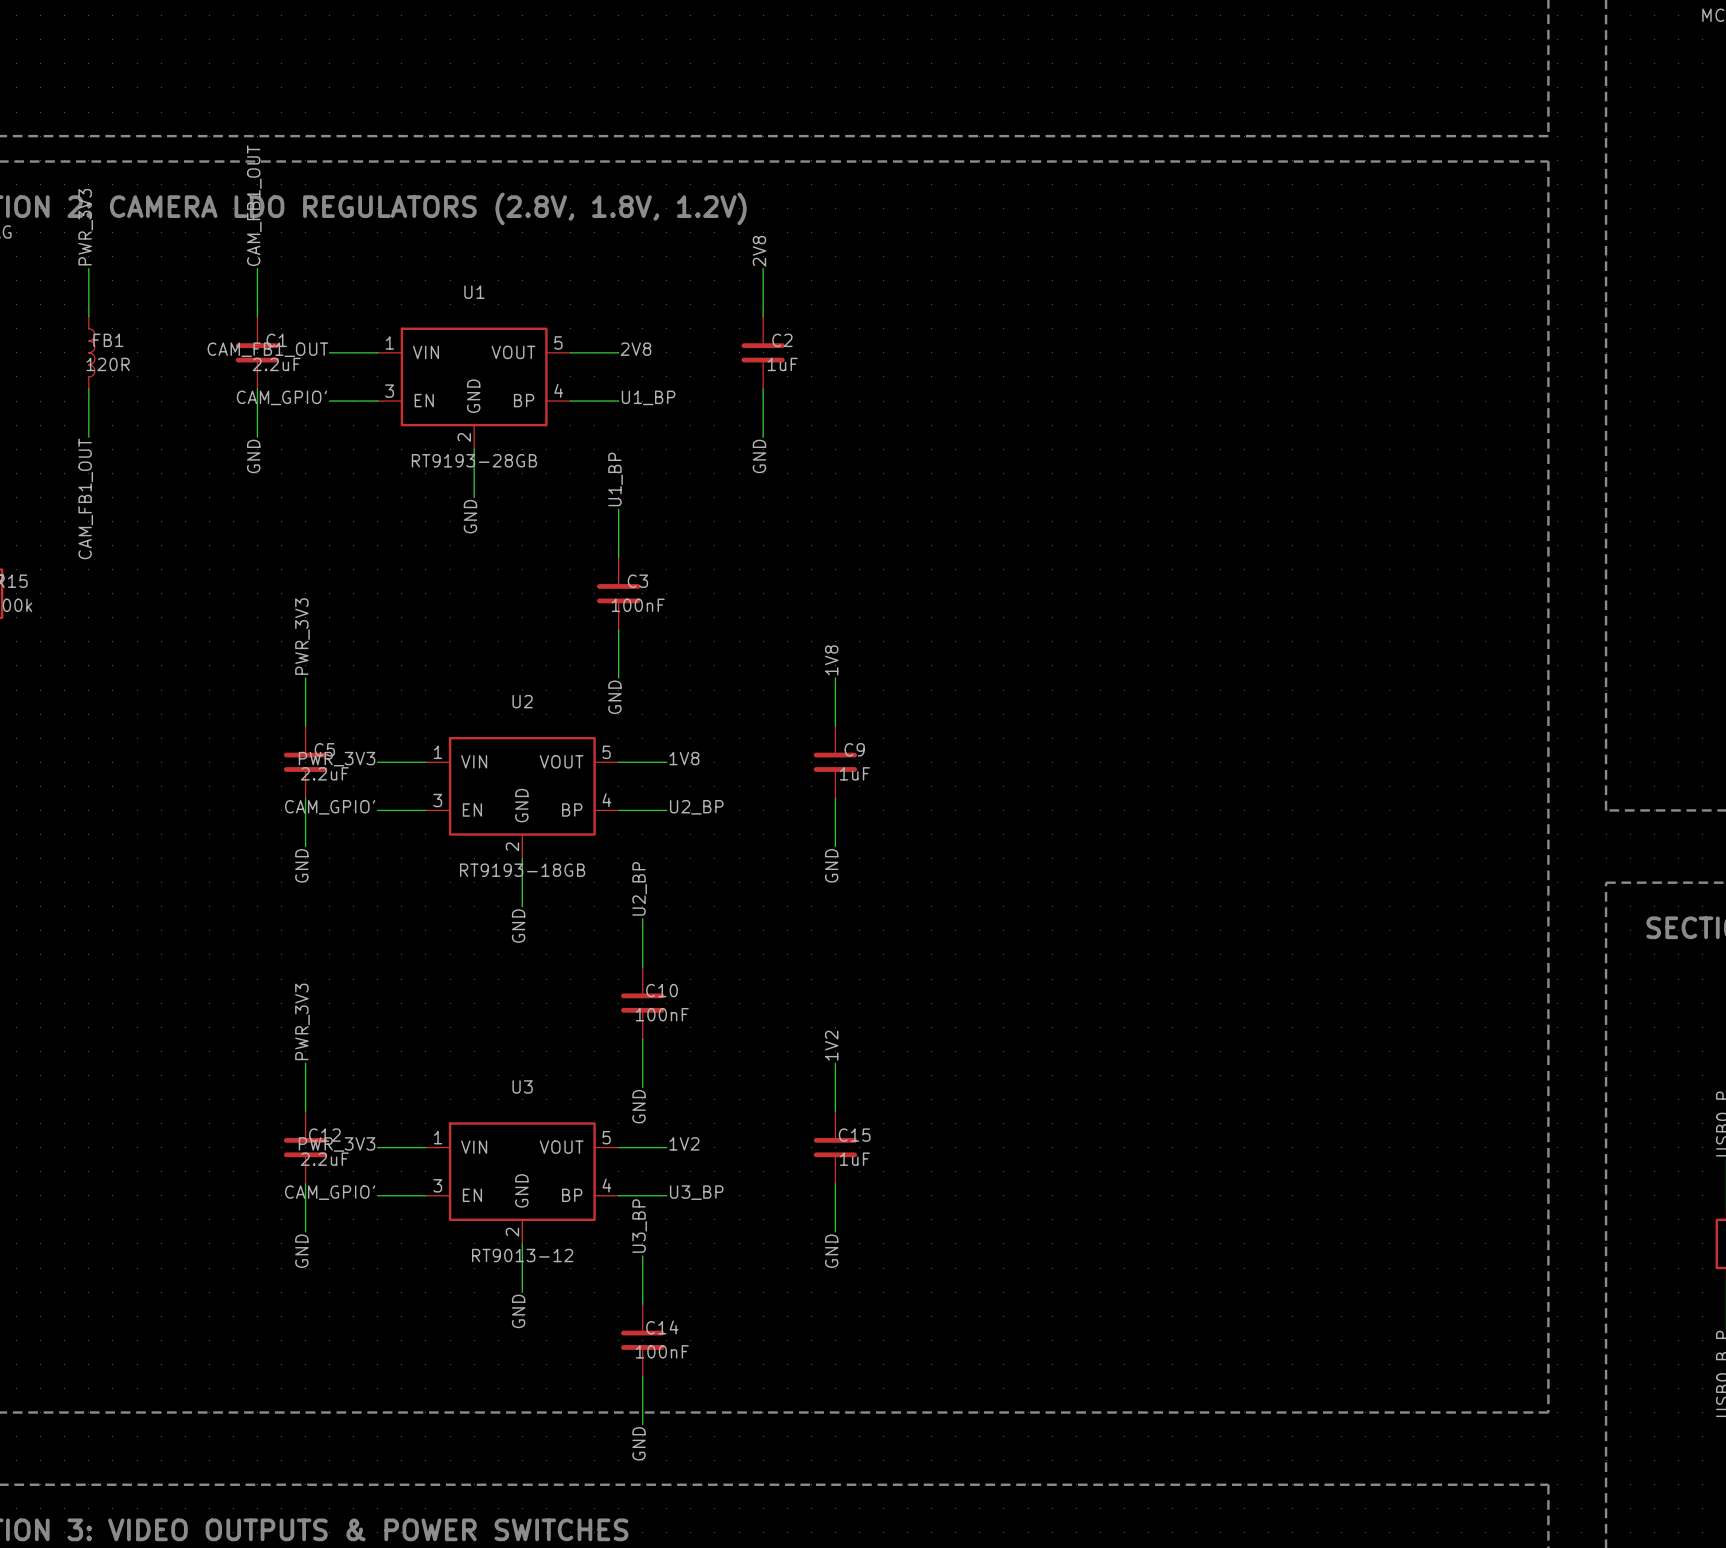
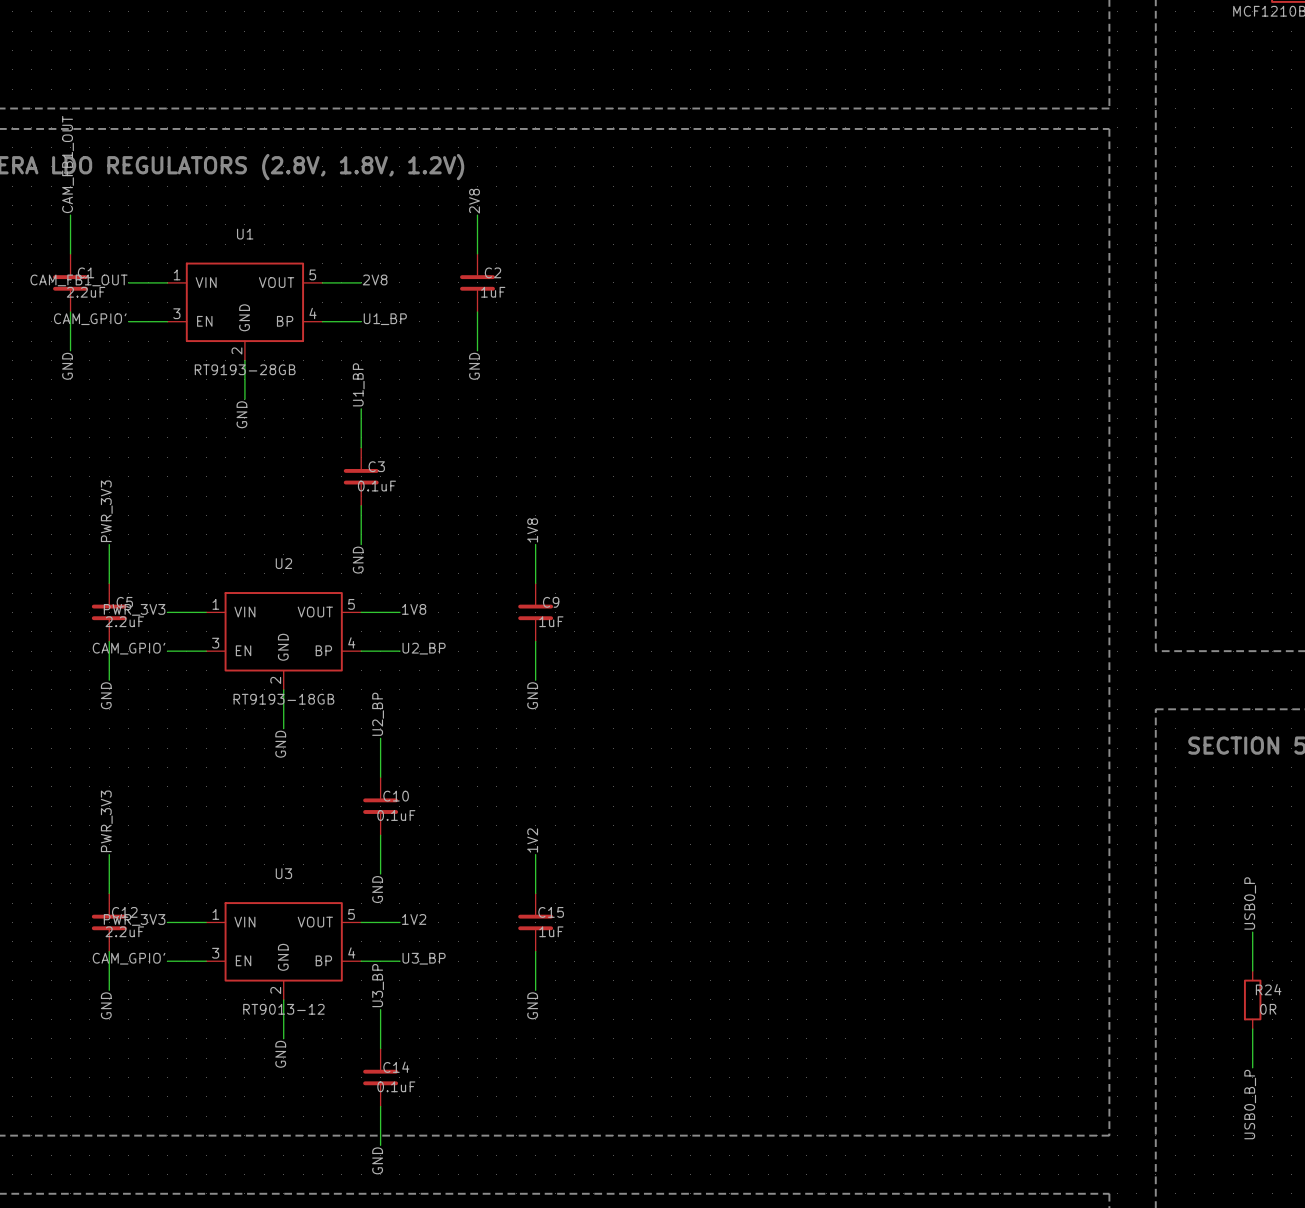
C3 value: 100nF (638, 605) -> 0.1uF (376, 486)
C10 value: 100nF (662, 1014) -> 0.1uF (396, 815)
C14 value: 100nF (662, 1351) -> 0.1uF (396, 1086)

